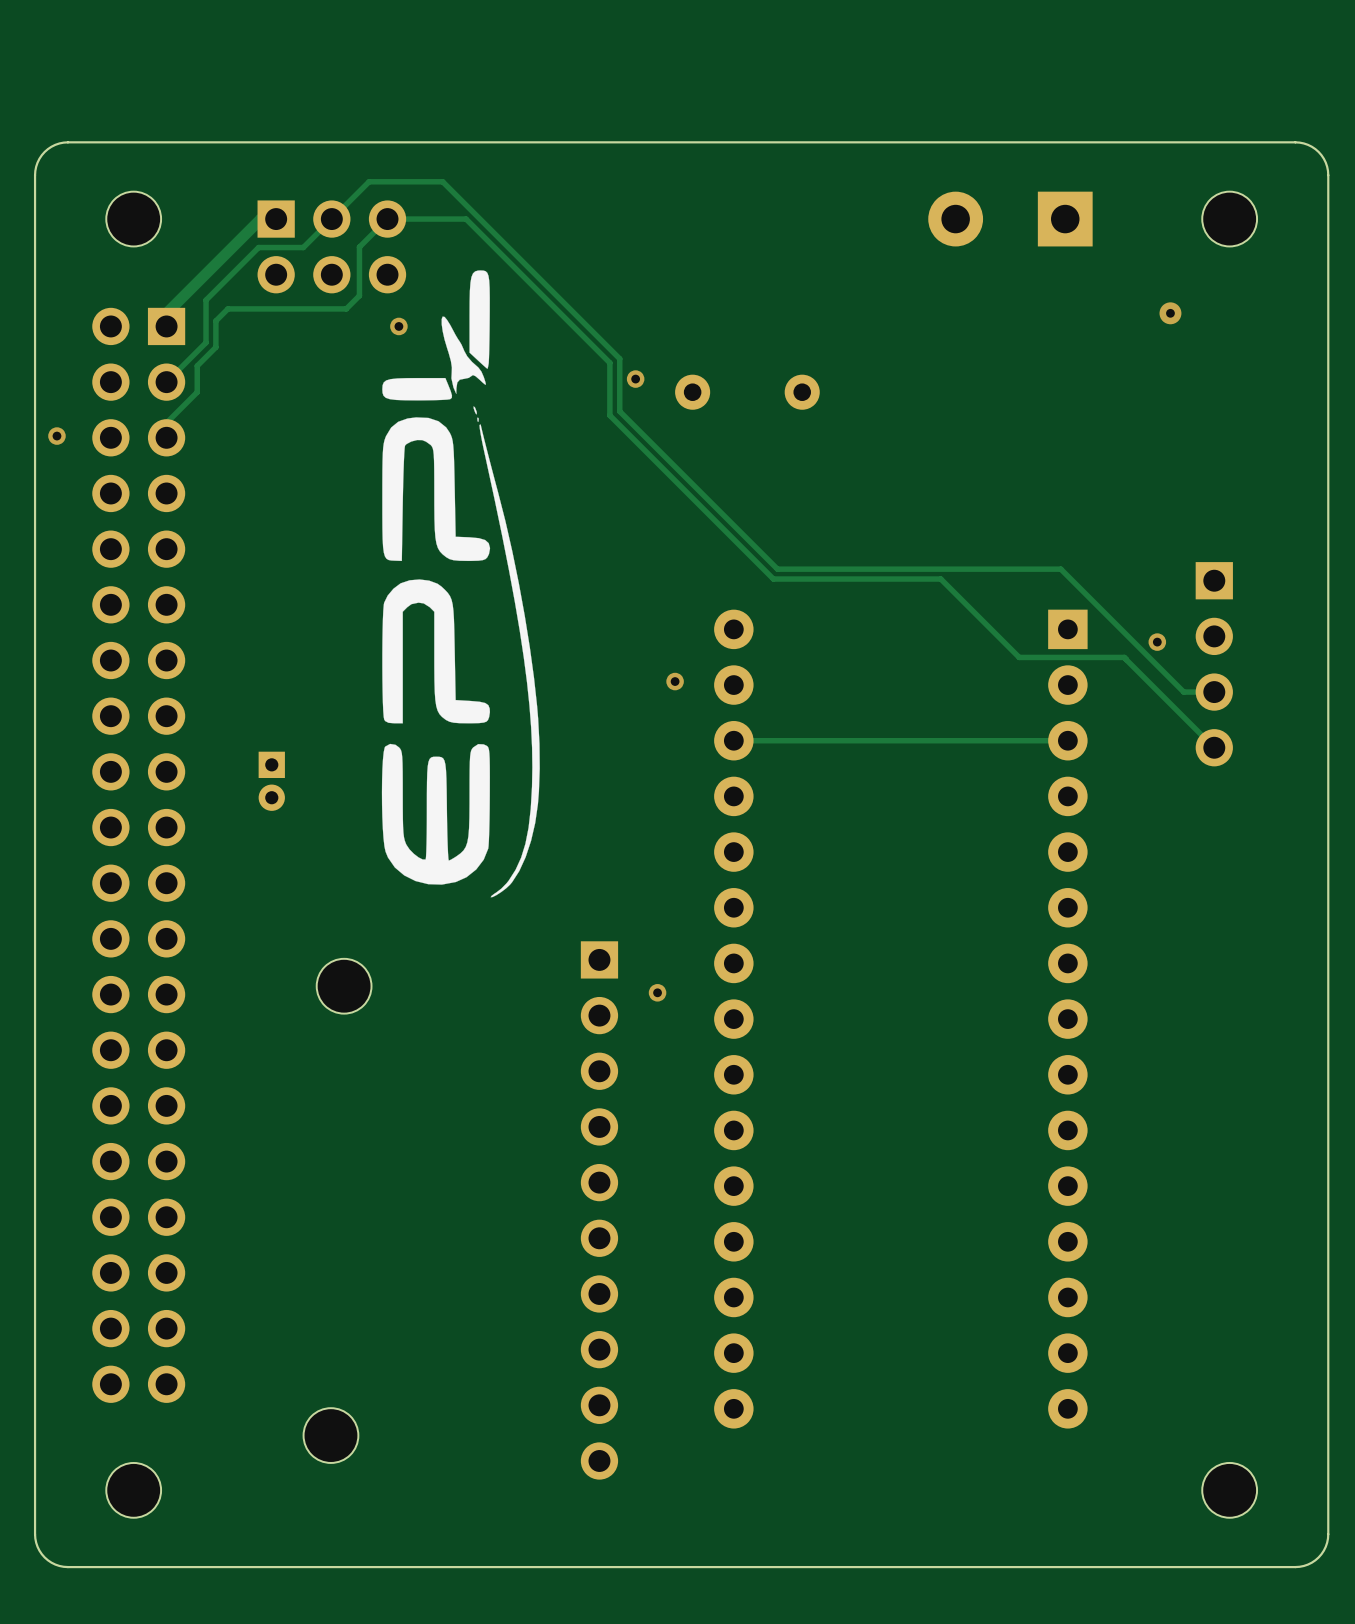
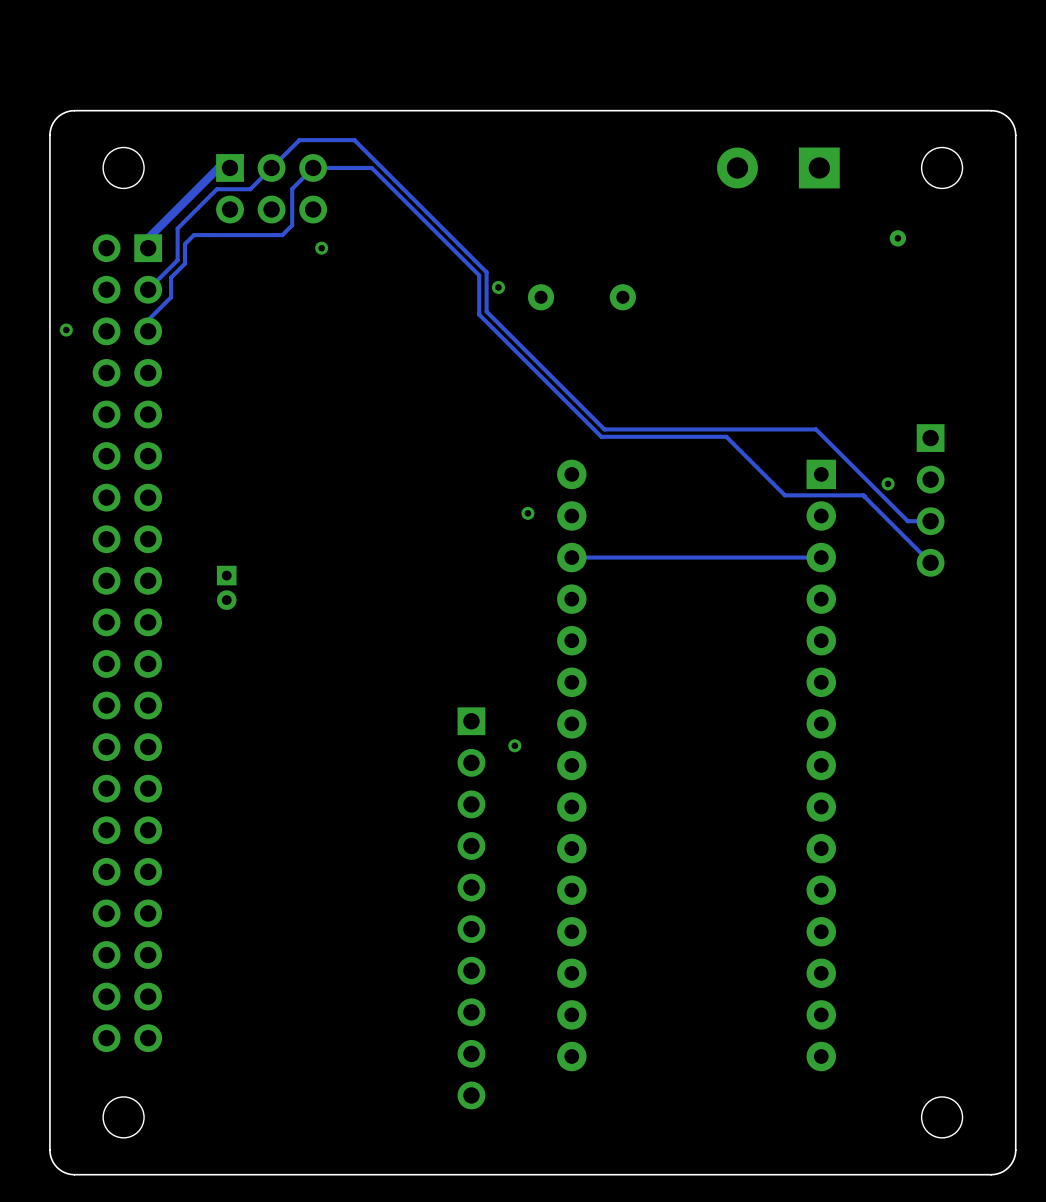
drawing: [381, 270, 540, 898] -> none
part: (344, 986) -> none
part: (330, 1435) -> none

